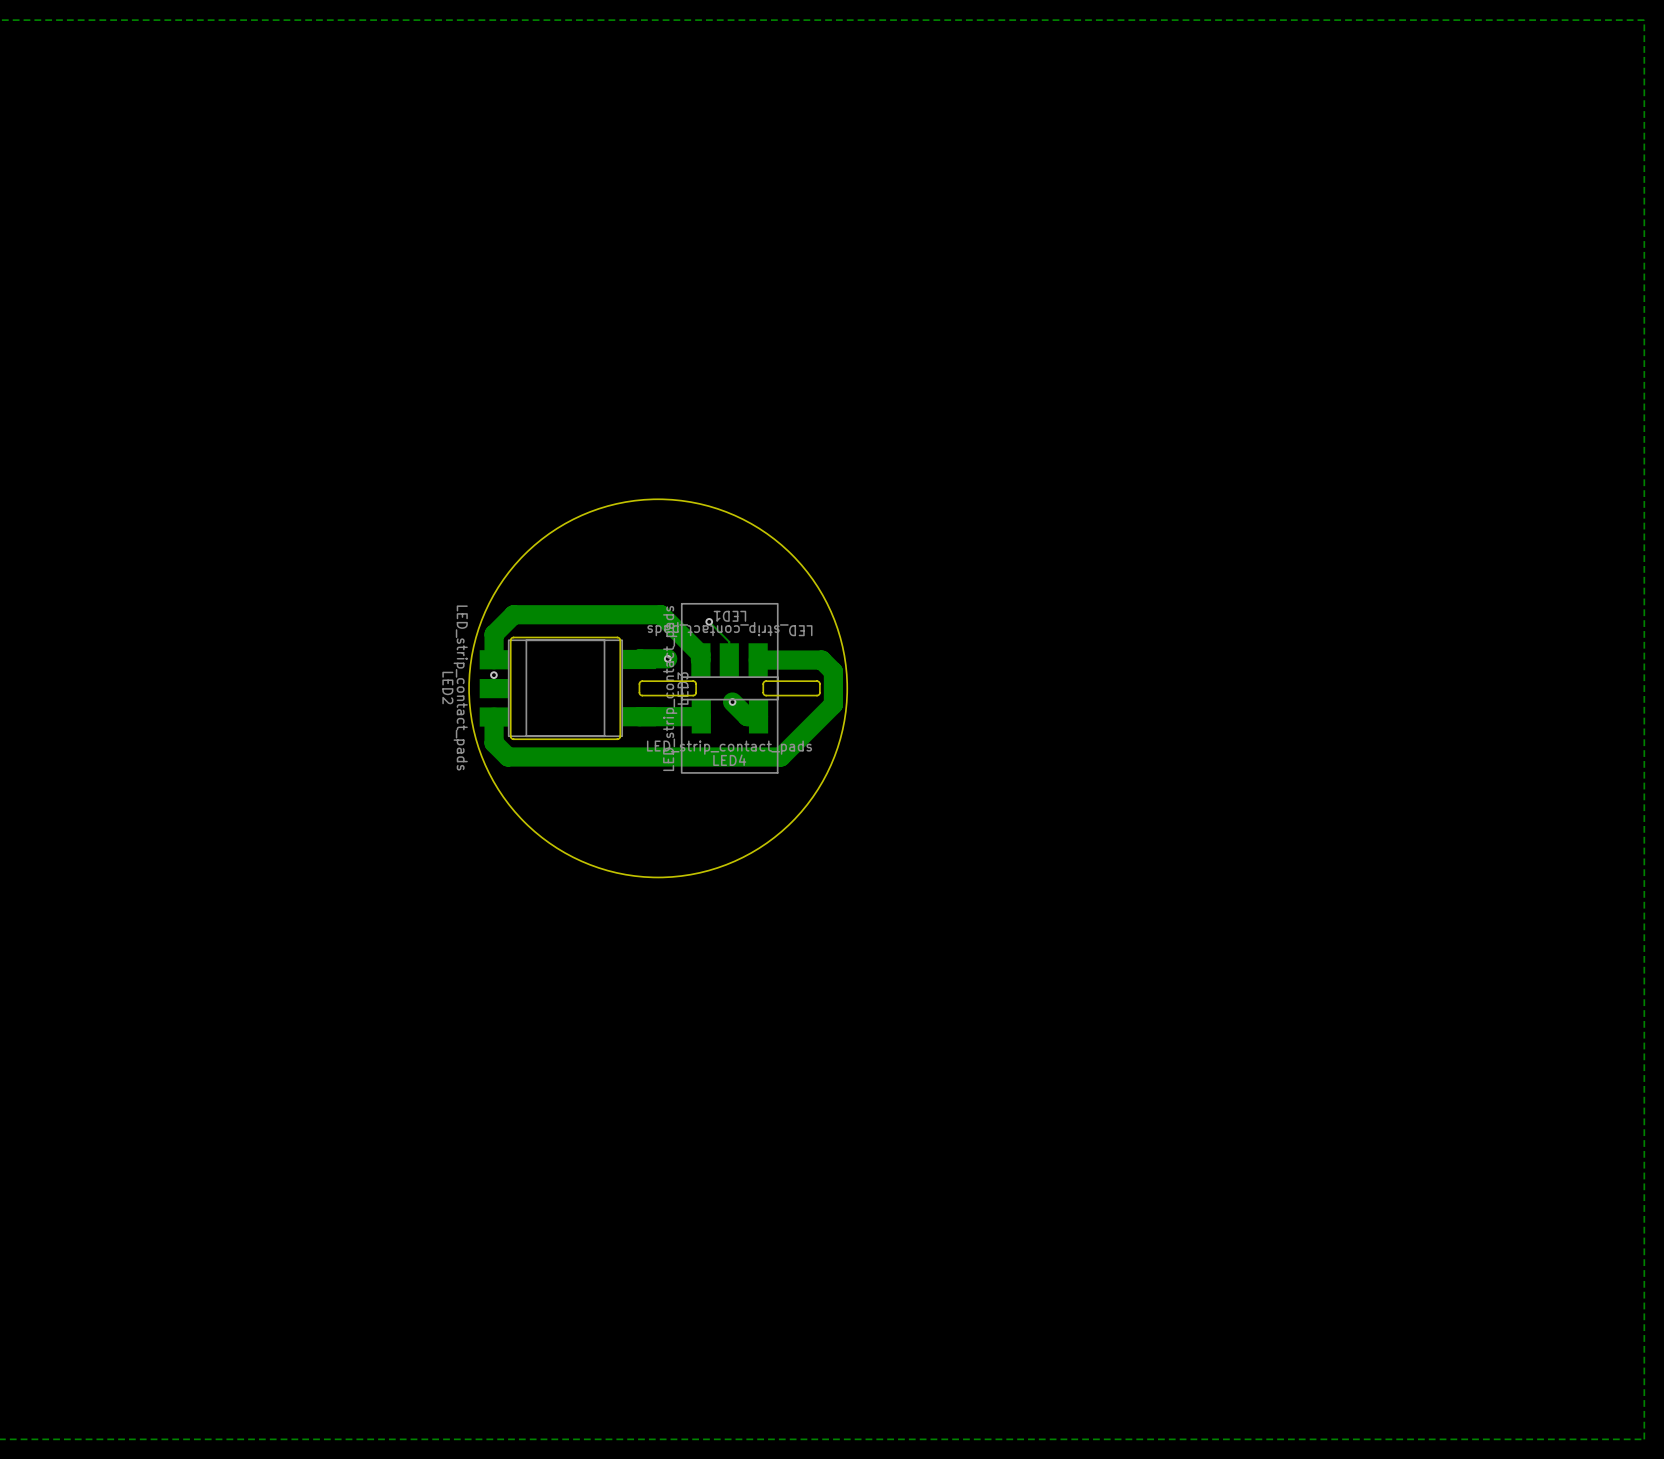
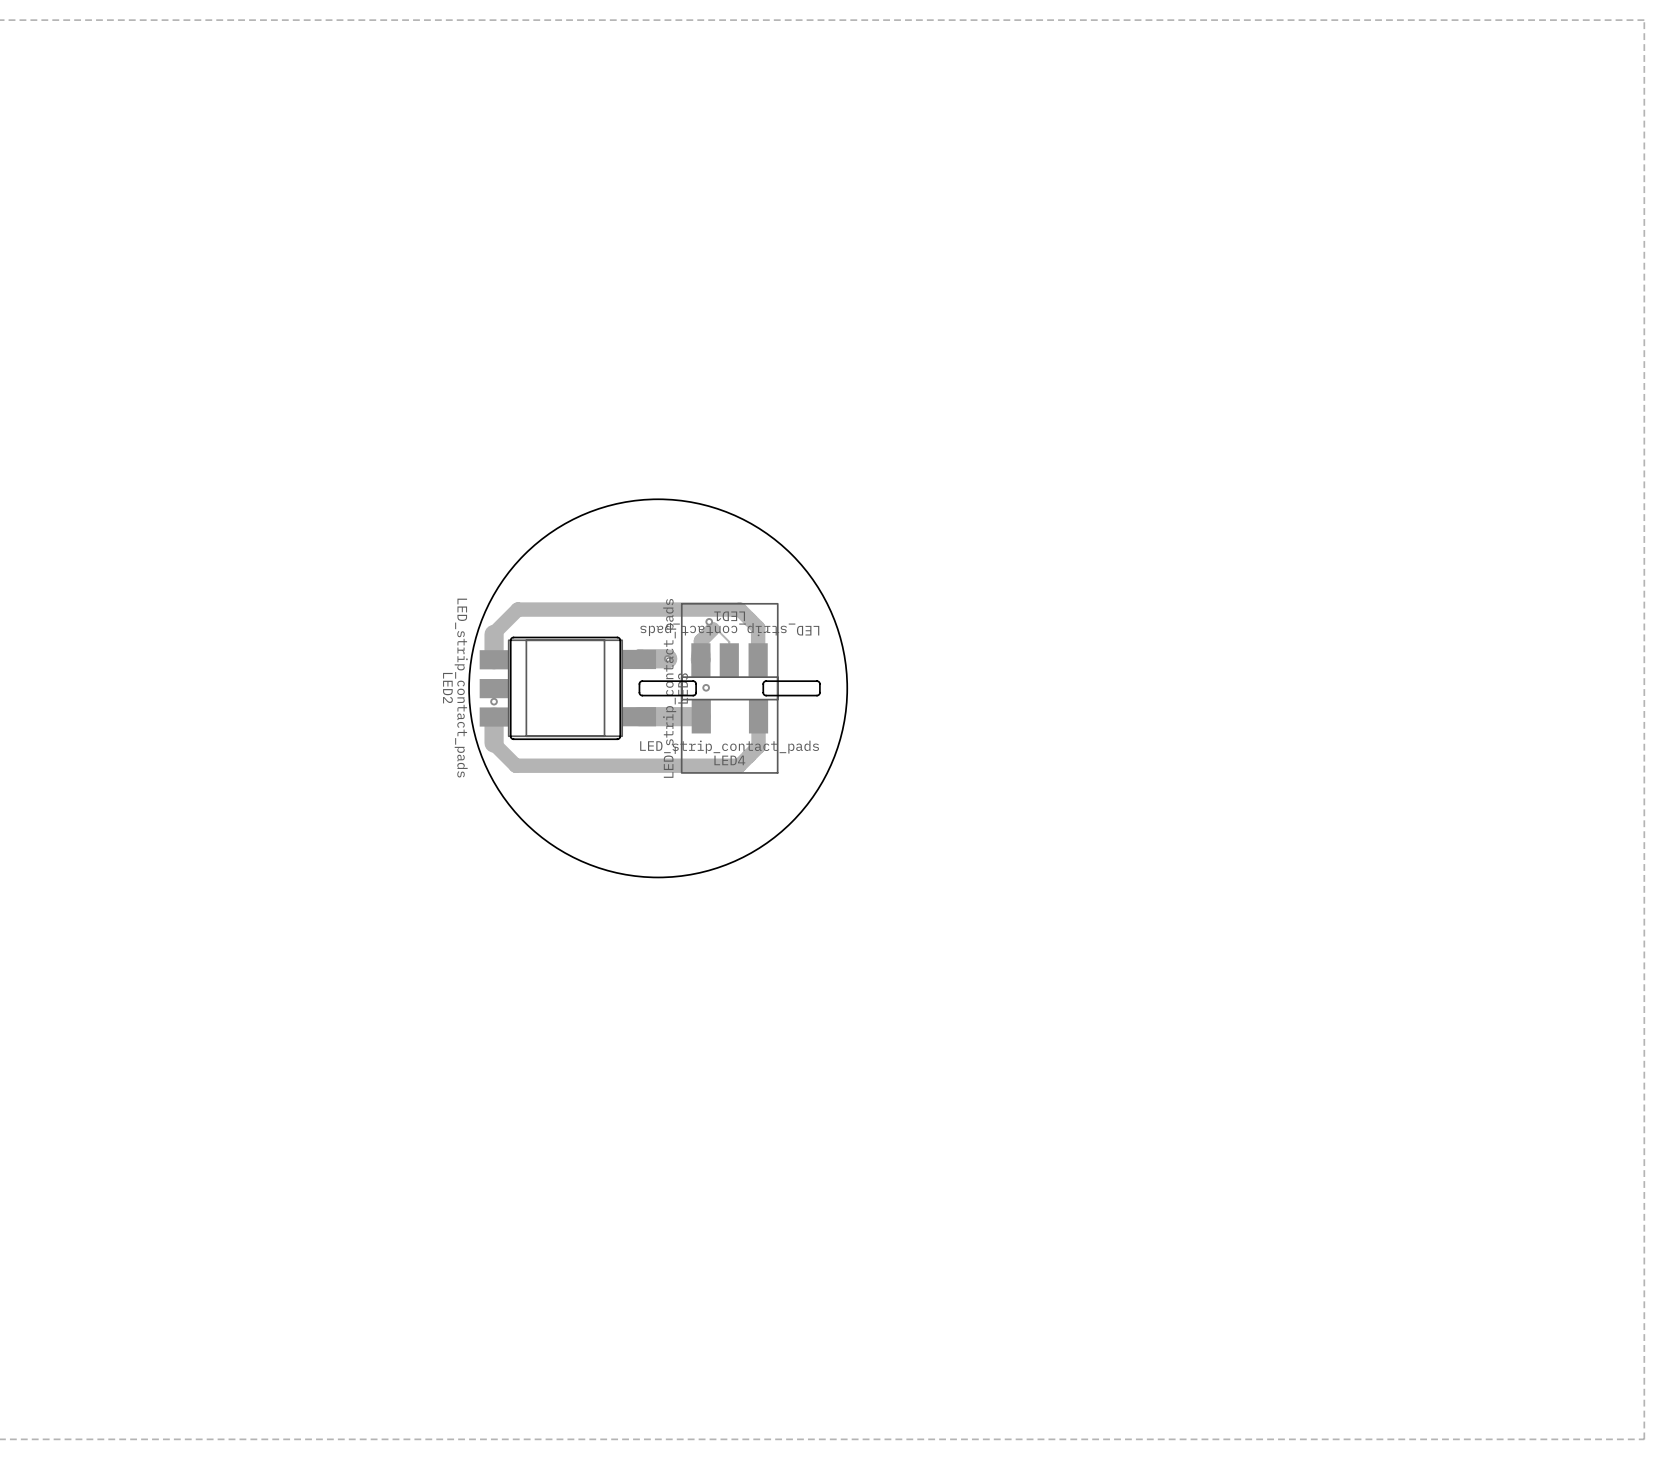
track: none -> (712, 629) (700, 641) (700, 654)
track: (494, 634) (513, 614) (661, 614) (700, 654) -> (494, 634) (517, 609) (739, 609) (758, 627) (758, 660)
track: (758, 660) (821, 660) (833, 671) (833, 704) (781, 756) (507, 756) (494, 743) -> (758, 716) (758, 746) (739, 765) (515, 765) (494, 743)
via position: (493, 675) -> (494, 701)
track: (732, 701) (747, 716) (758, 716) -> none
via position: (732, 701) -> (706, 687)

